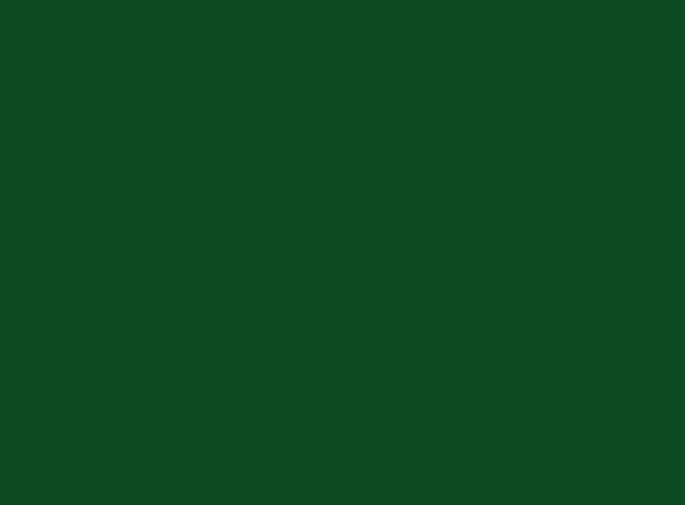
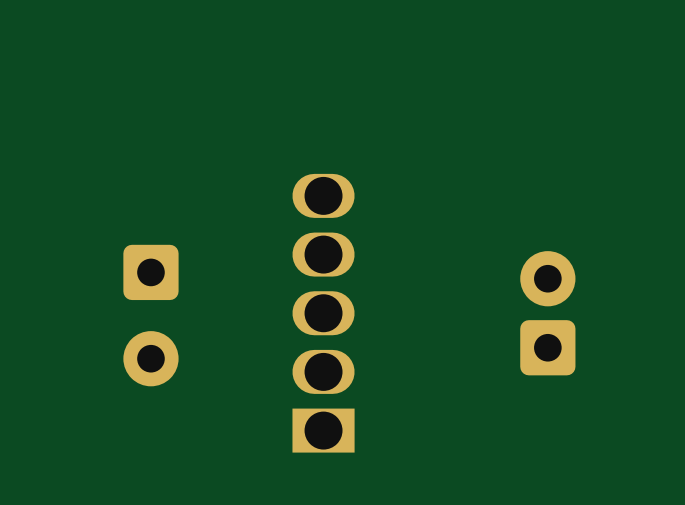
part: none -> (323, 313)
part: none -> (547, 313)
part: none -> (150, 315)

